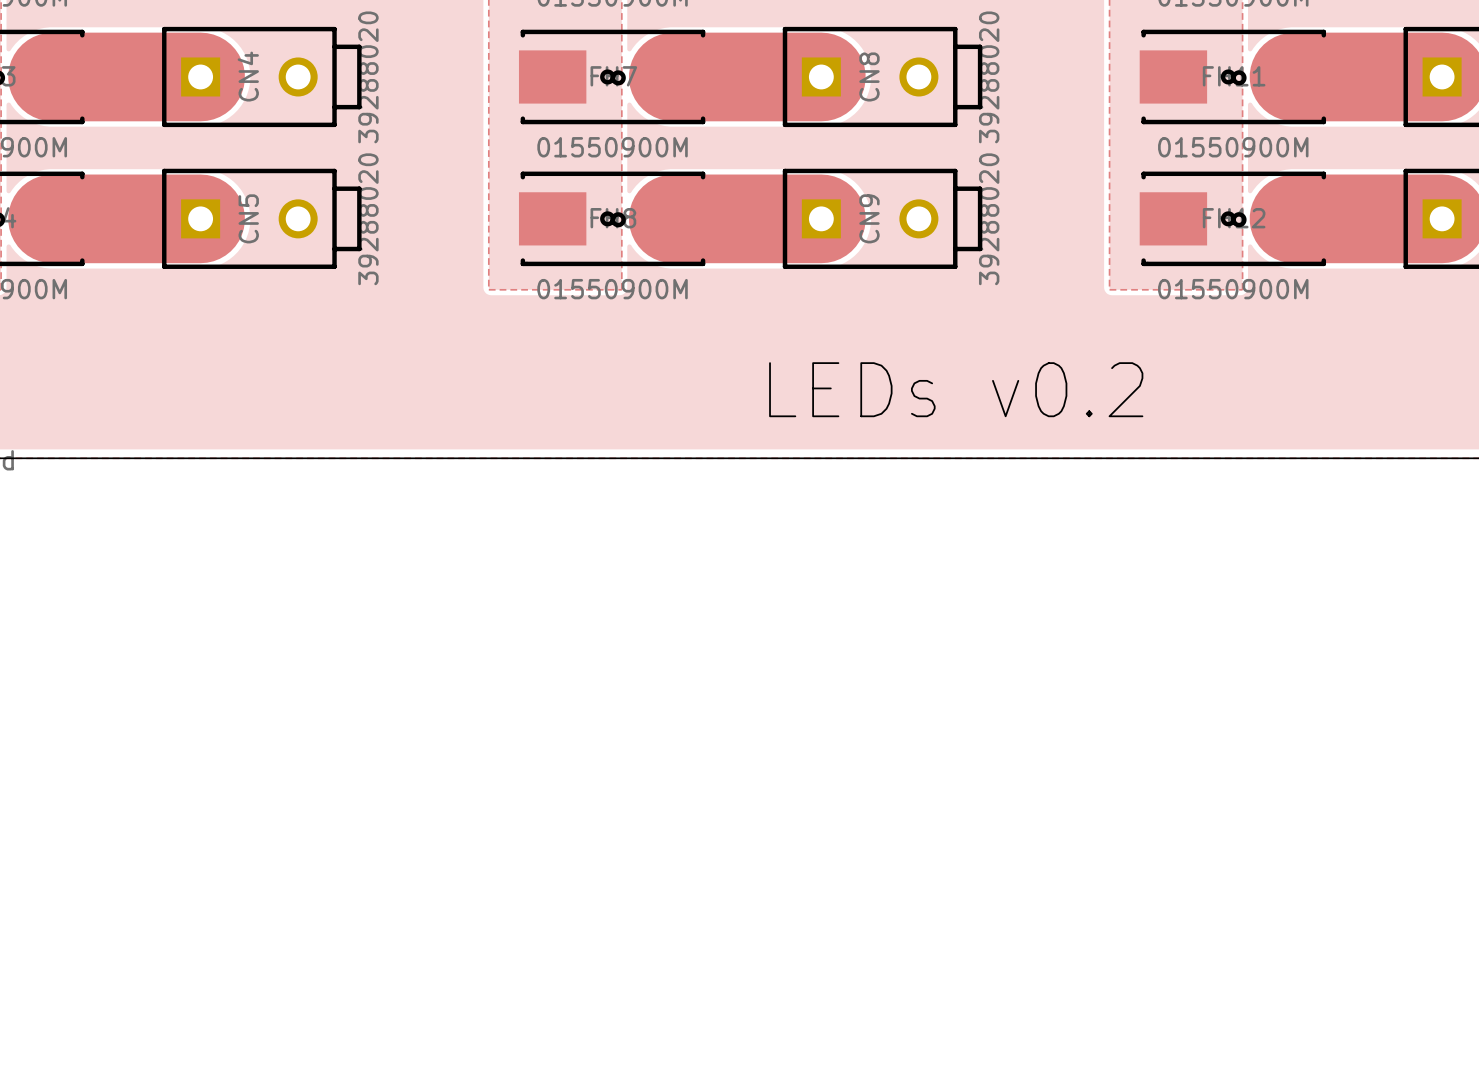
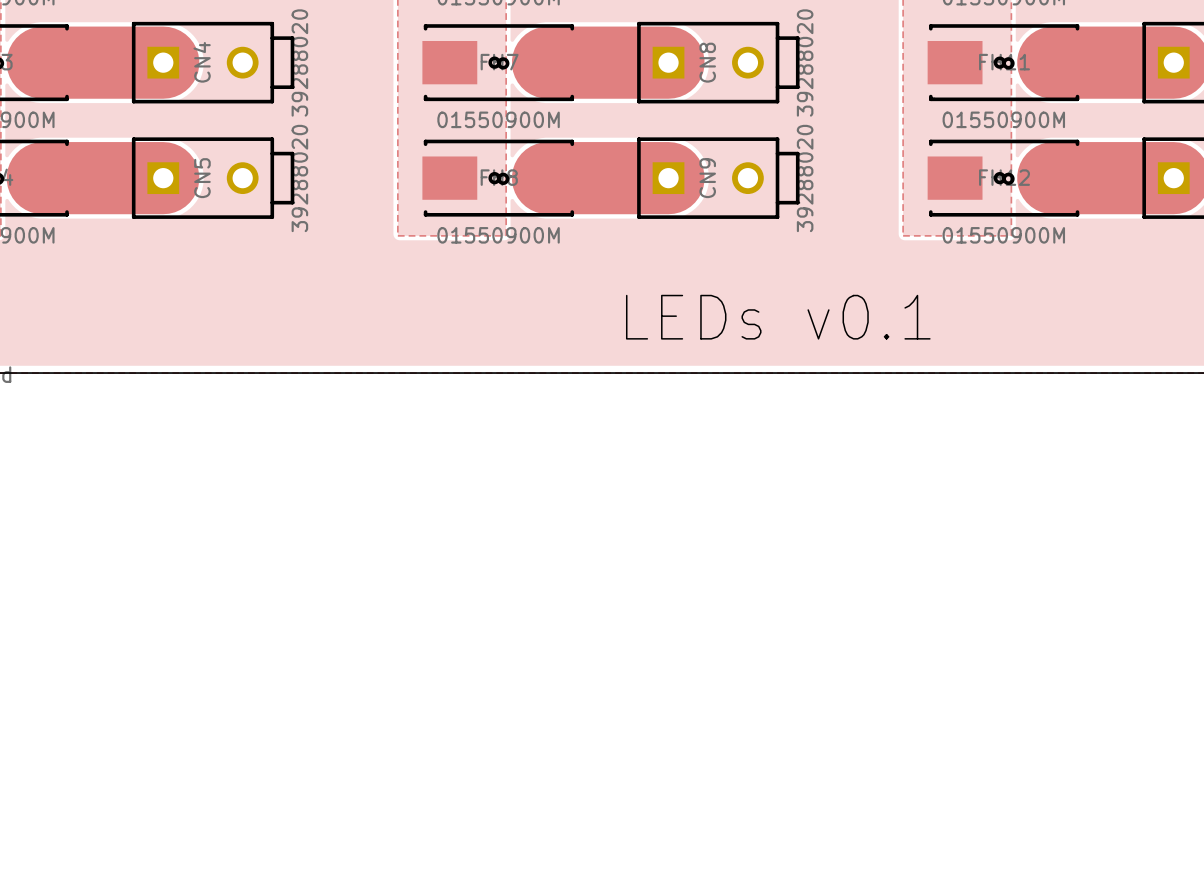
text: LEDs v0.2 (956, 389) -> LEDs v0.1 (778, 317)

